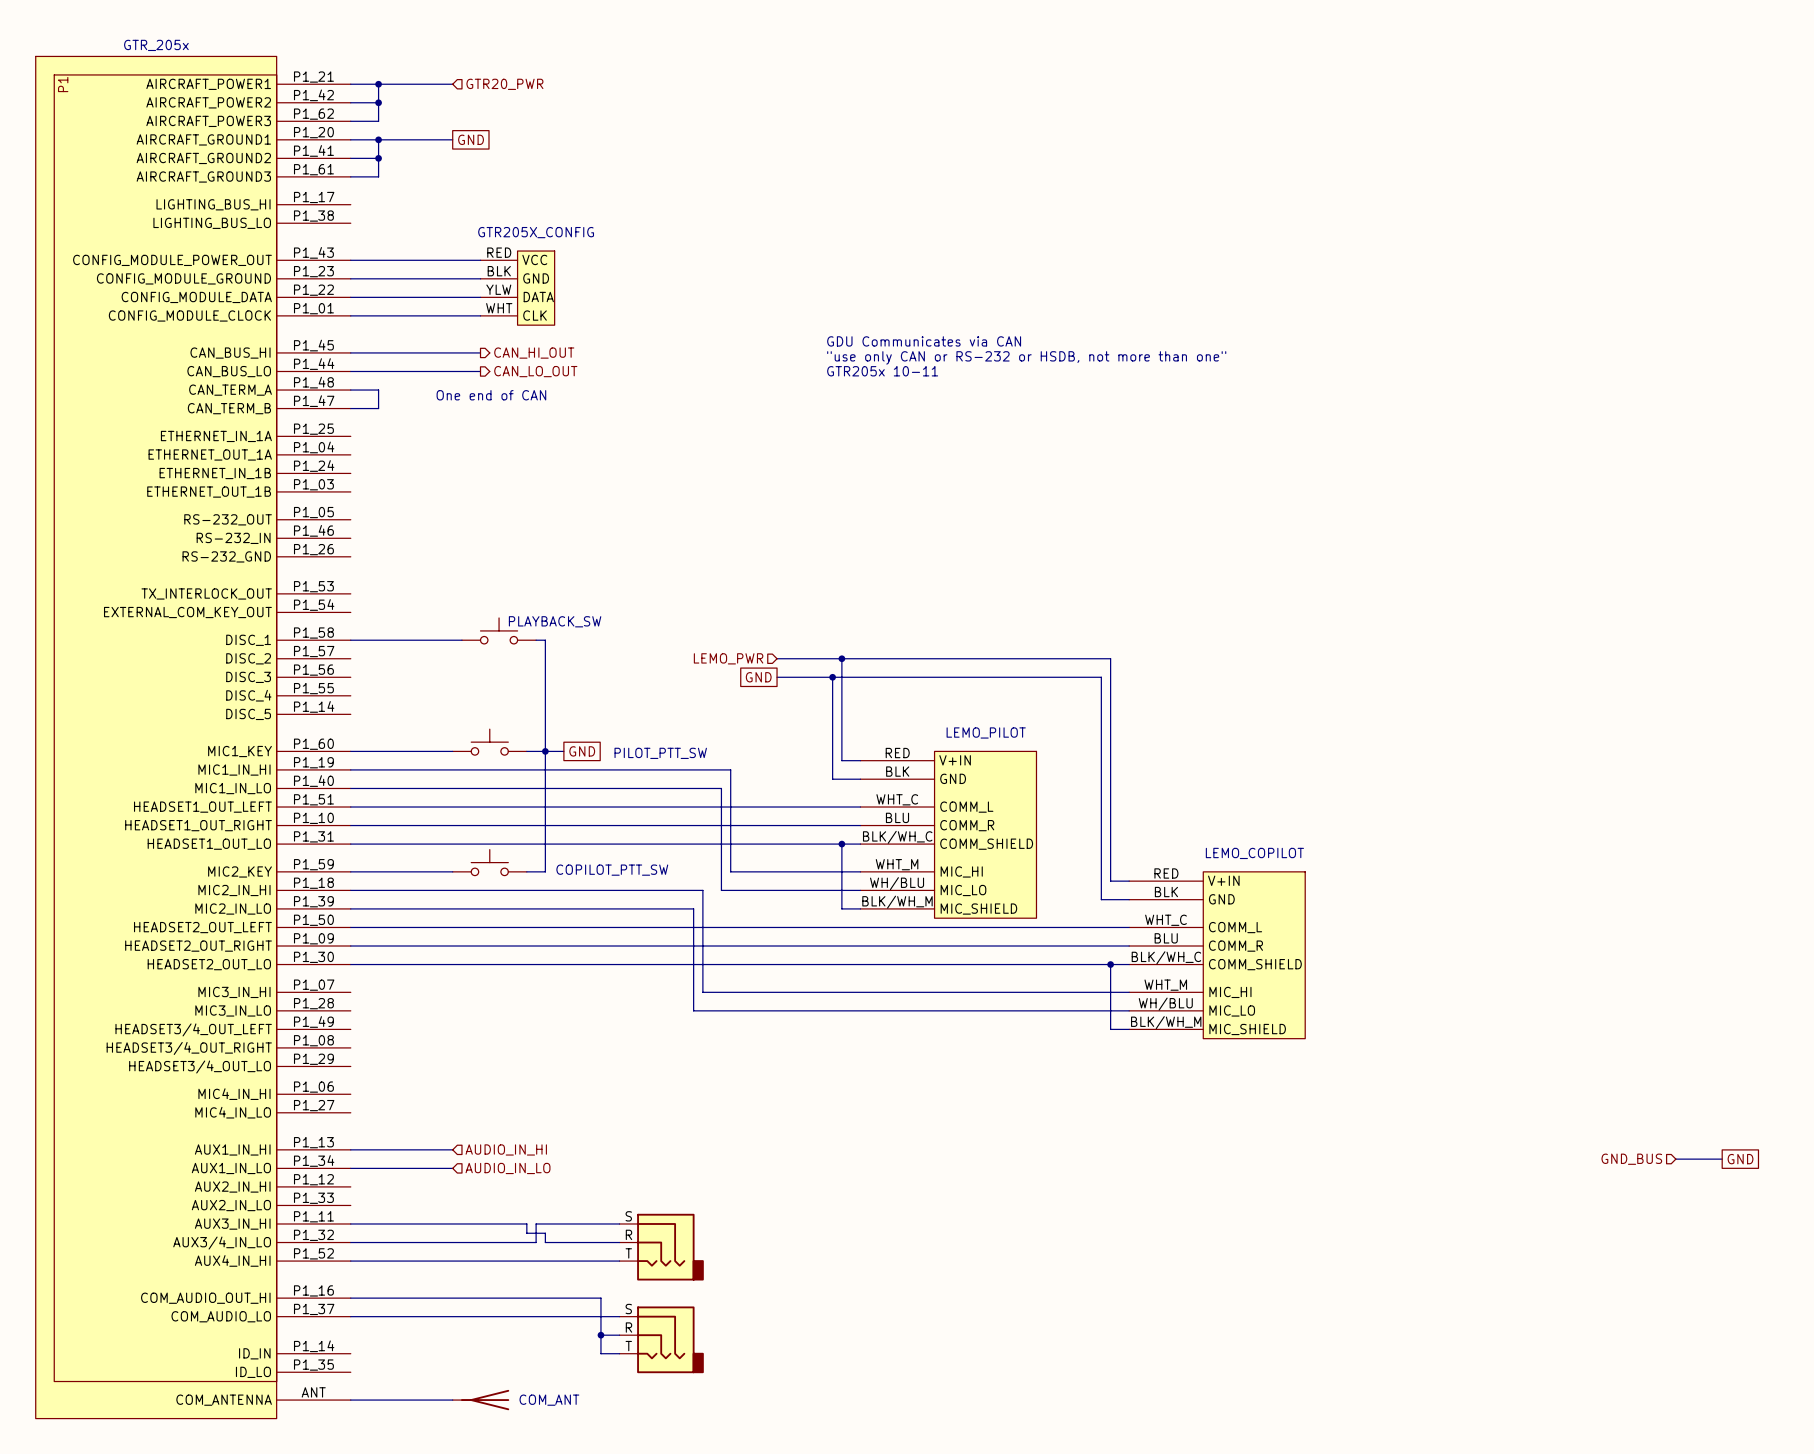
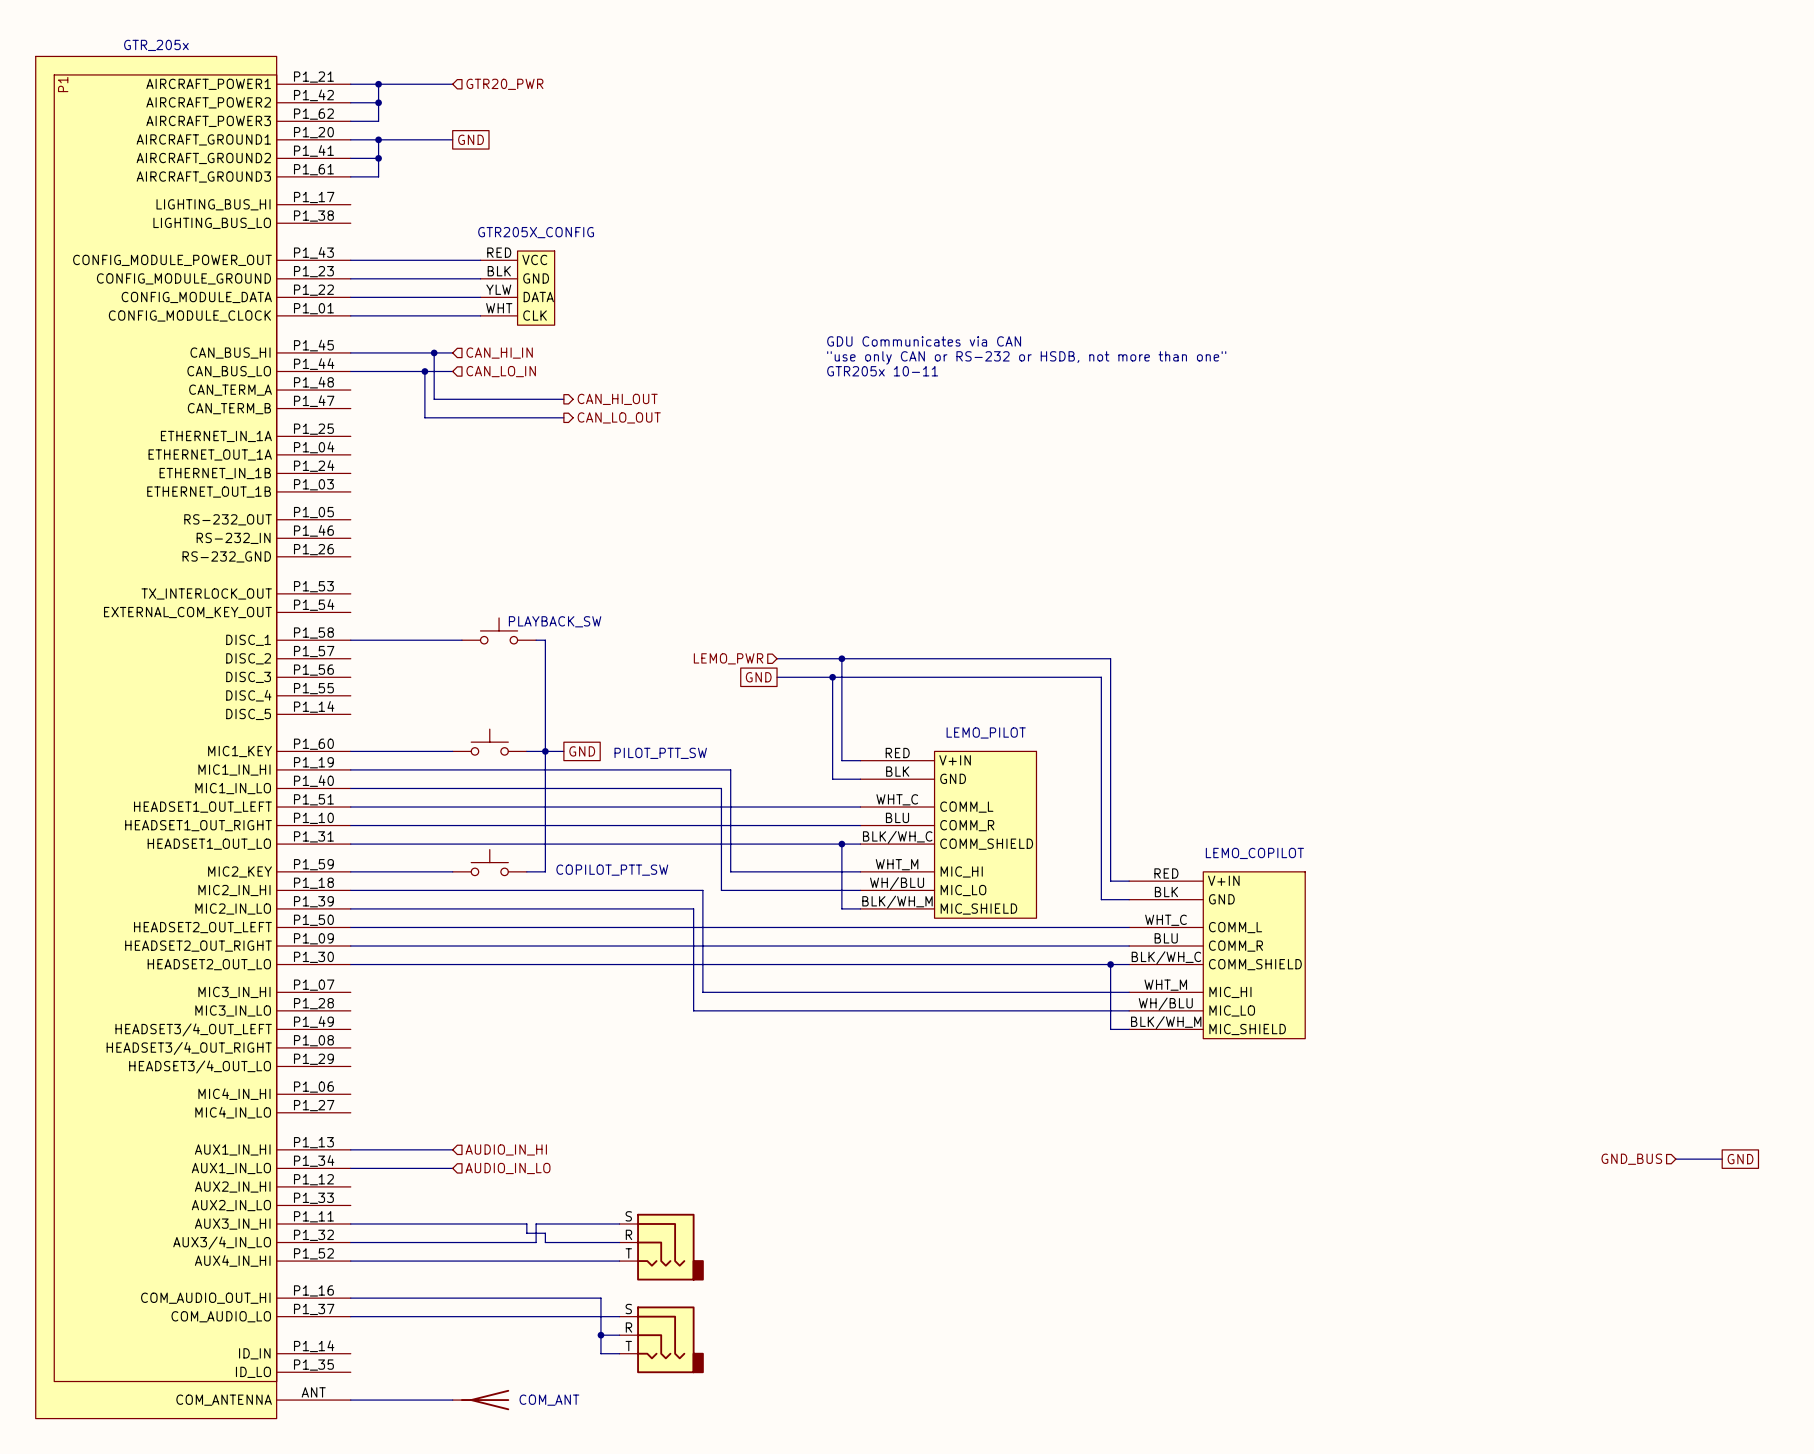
wire: none -> (434, 352) (434, 399) (563, 399)
junction: none -> (434, 352)
wire: (452, 352) (480, 352) -> none
hierarchical label: none -> CAN_HI_IN (499, 353)
hierarchical label position: CAN_HI_OUT (534, 353) -> CAN_HI_OUT (617, 399)
wire: none -> (424, 371) (424, 417) (563, 417)
junction: none -> (424, 371)
wire: (452, 371) (480, 371) -> none
hierarchical label: none -> CAN_LO_IN (501, 371)
hierarchical label position: CAN_LO_OUT (535, 371) -> CAN_LO_OUT (619, 417)
wire: (350, 390) (378, 390) (378, 408) (350, 408) -> none
text: One end of CAN (491, 395) -> none

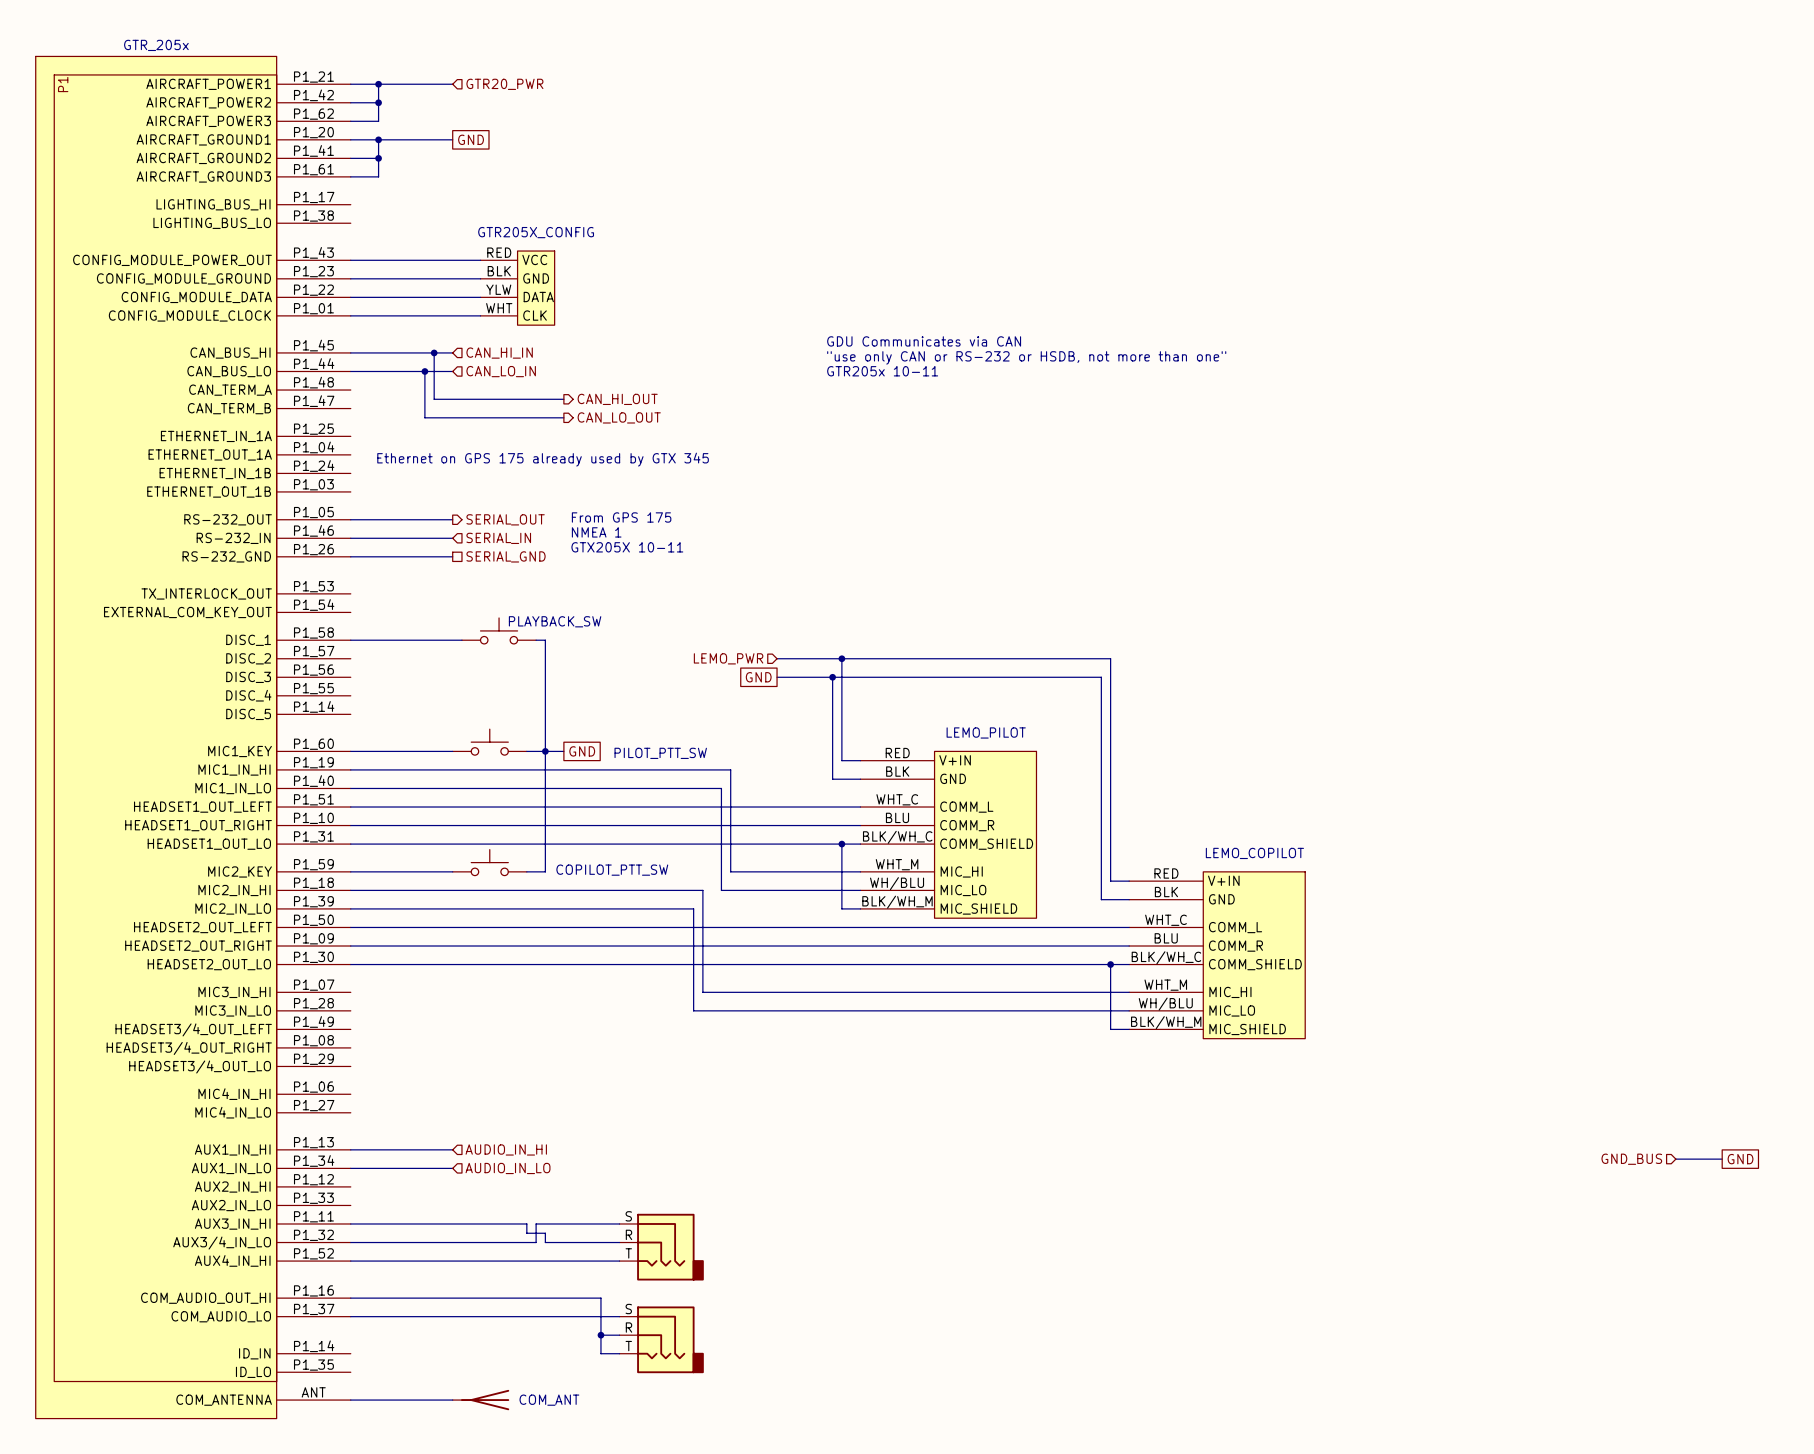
text: none -> Ethernet on GPS 175 already used by GTX 345 (543, 459)
text: none -> From GPS 175 (621, 517)
wire: none -> (350, 519) (452, 519)
hierarchical label: none -> SERIAL_OUT (505, 519)
text: none -> NMEA 1 (596, 532)
wire: none -> (350, 538) (452, 538)
hierarchical label: none -> SERIAL_IN (498, 538)
text: none -> GTX205X 10-11 (627, 547)
wire: none -> (350, 556) (452, 556)
hierarchical label: none -> SERIAL_GND (506, 556)

